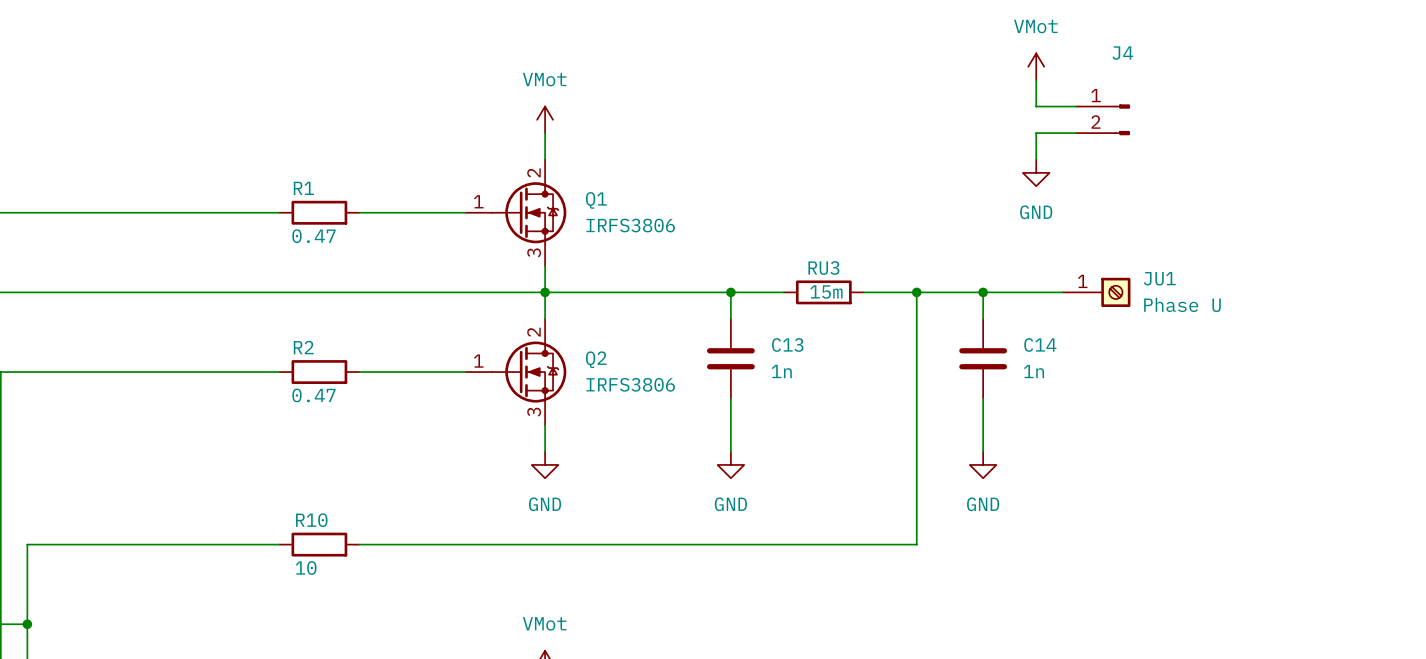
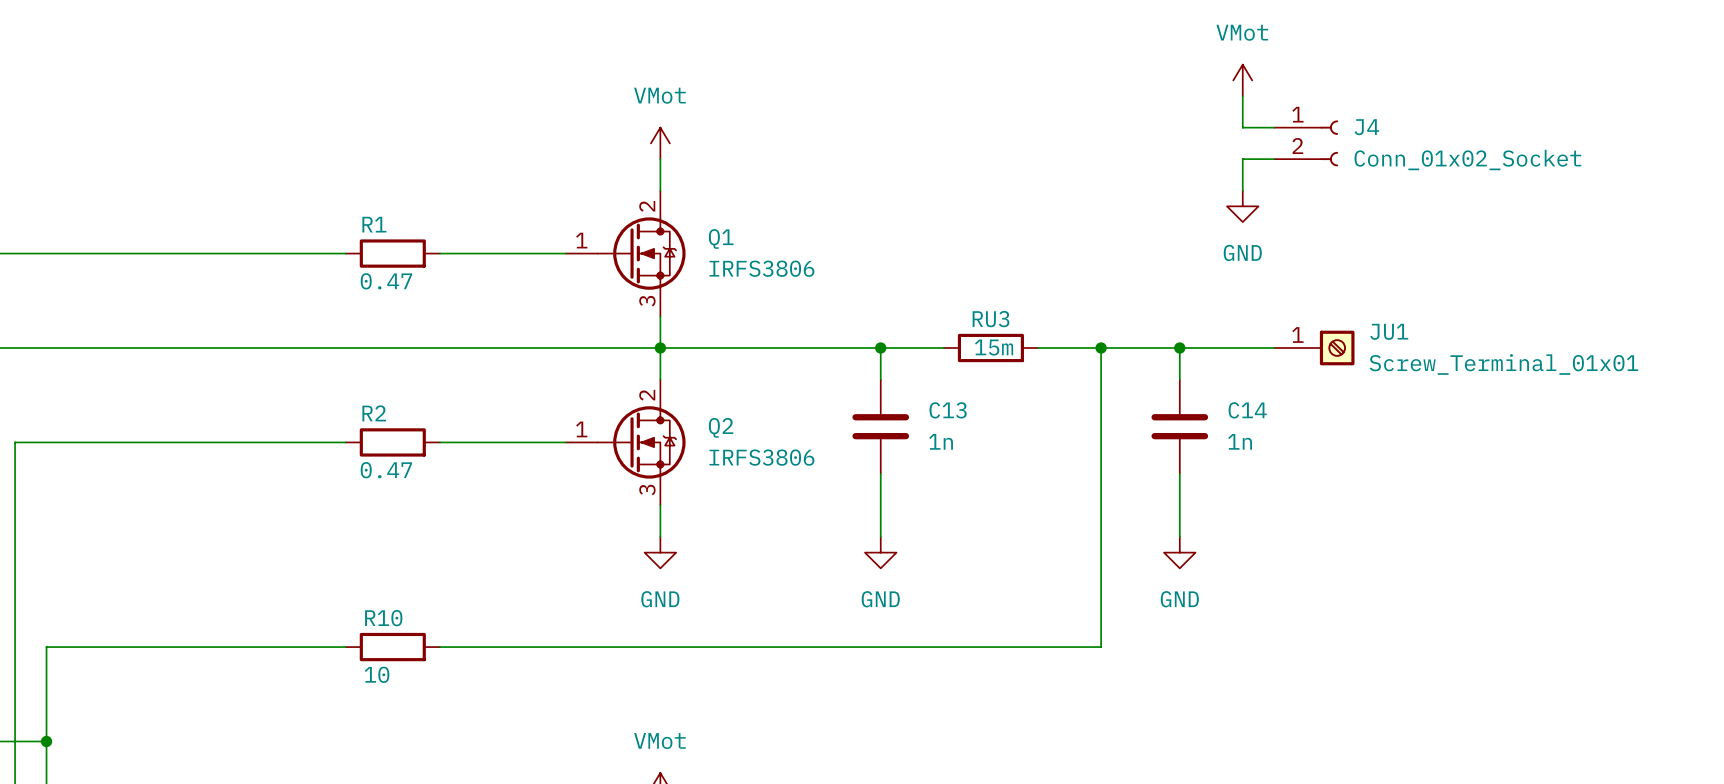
J4 name position: J4 (1122, 53) -> J4 (1366, 127)
J4 symbol: [1076, 104, 1130, 136] -> [1274, 120, 1339, 167]
J4 value: none -> Conn_01x02_Socket (1467, 159)
JU1 value: Phase U (1182, 304) -> Screw_Terminal_01x01 (1503, 364)

